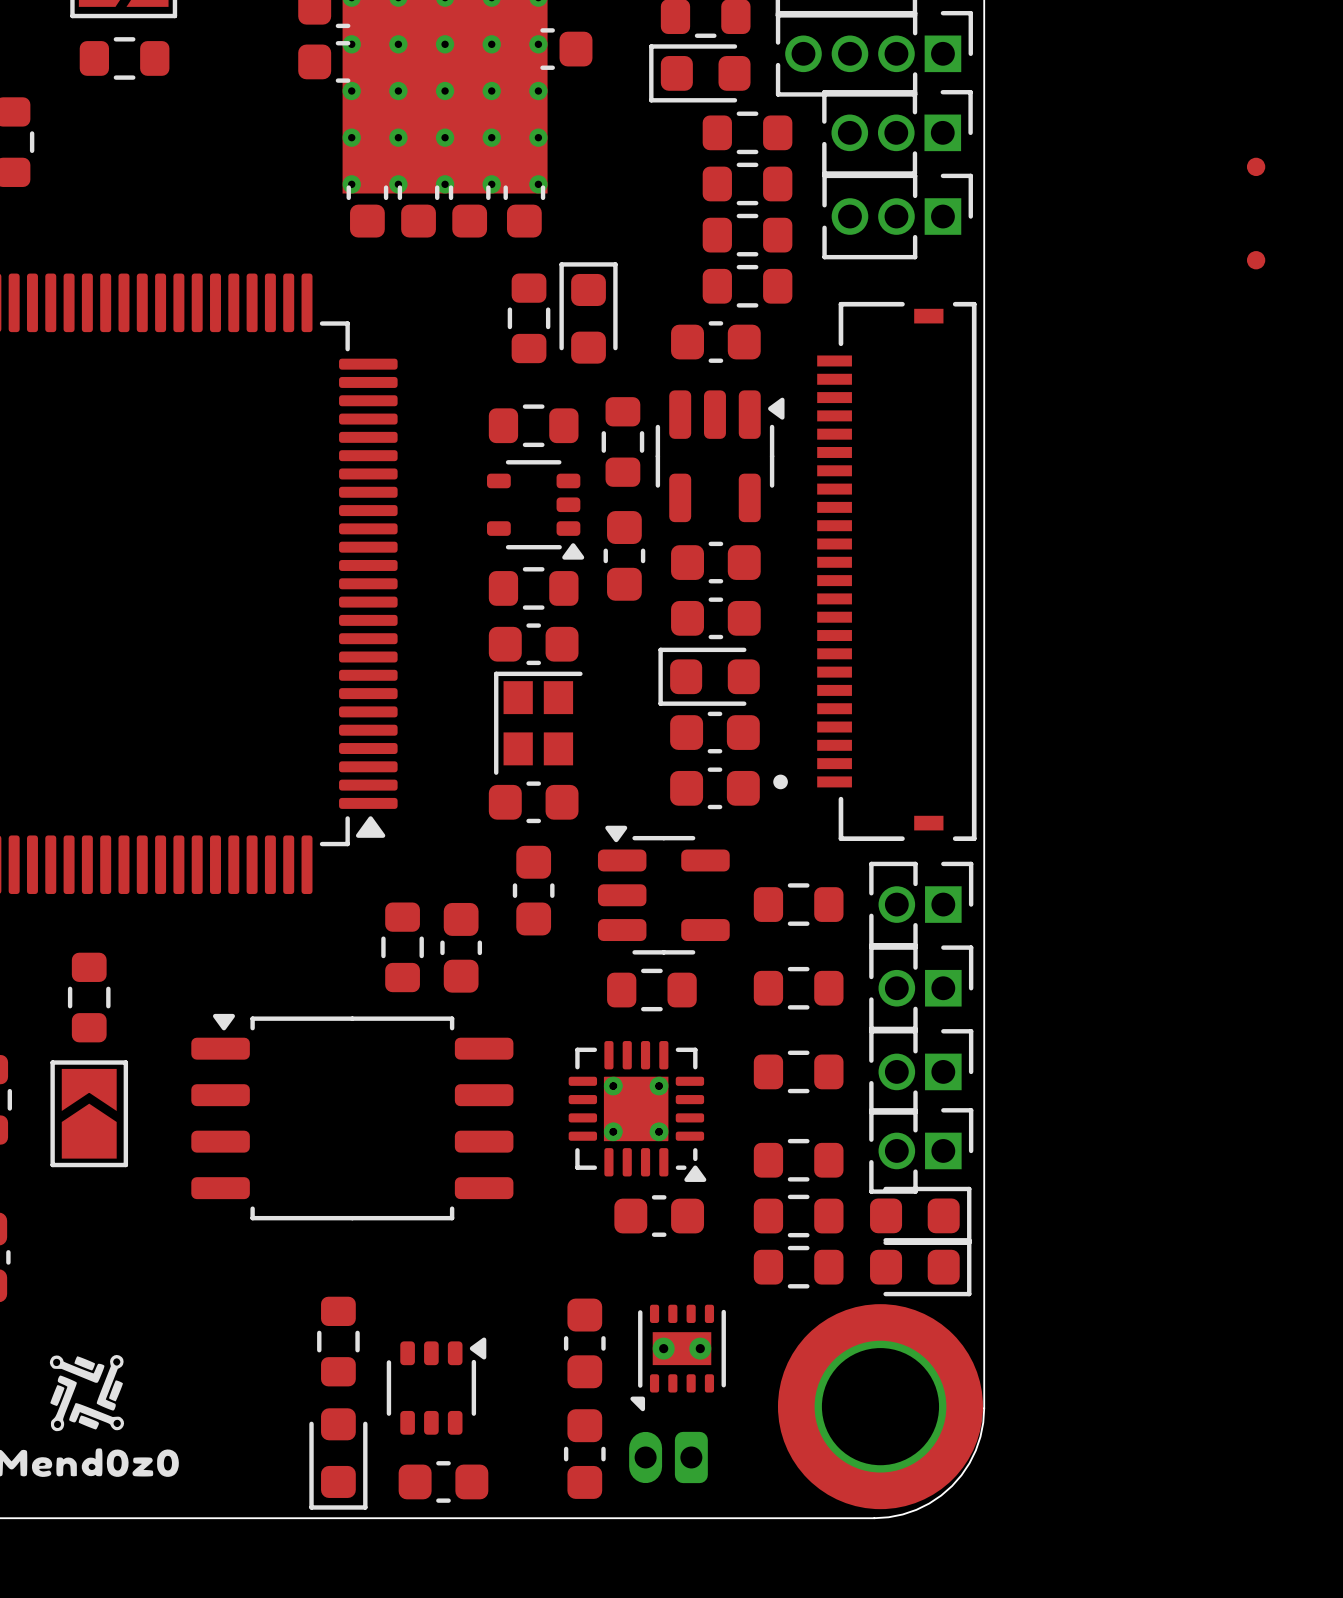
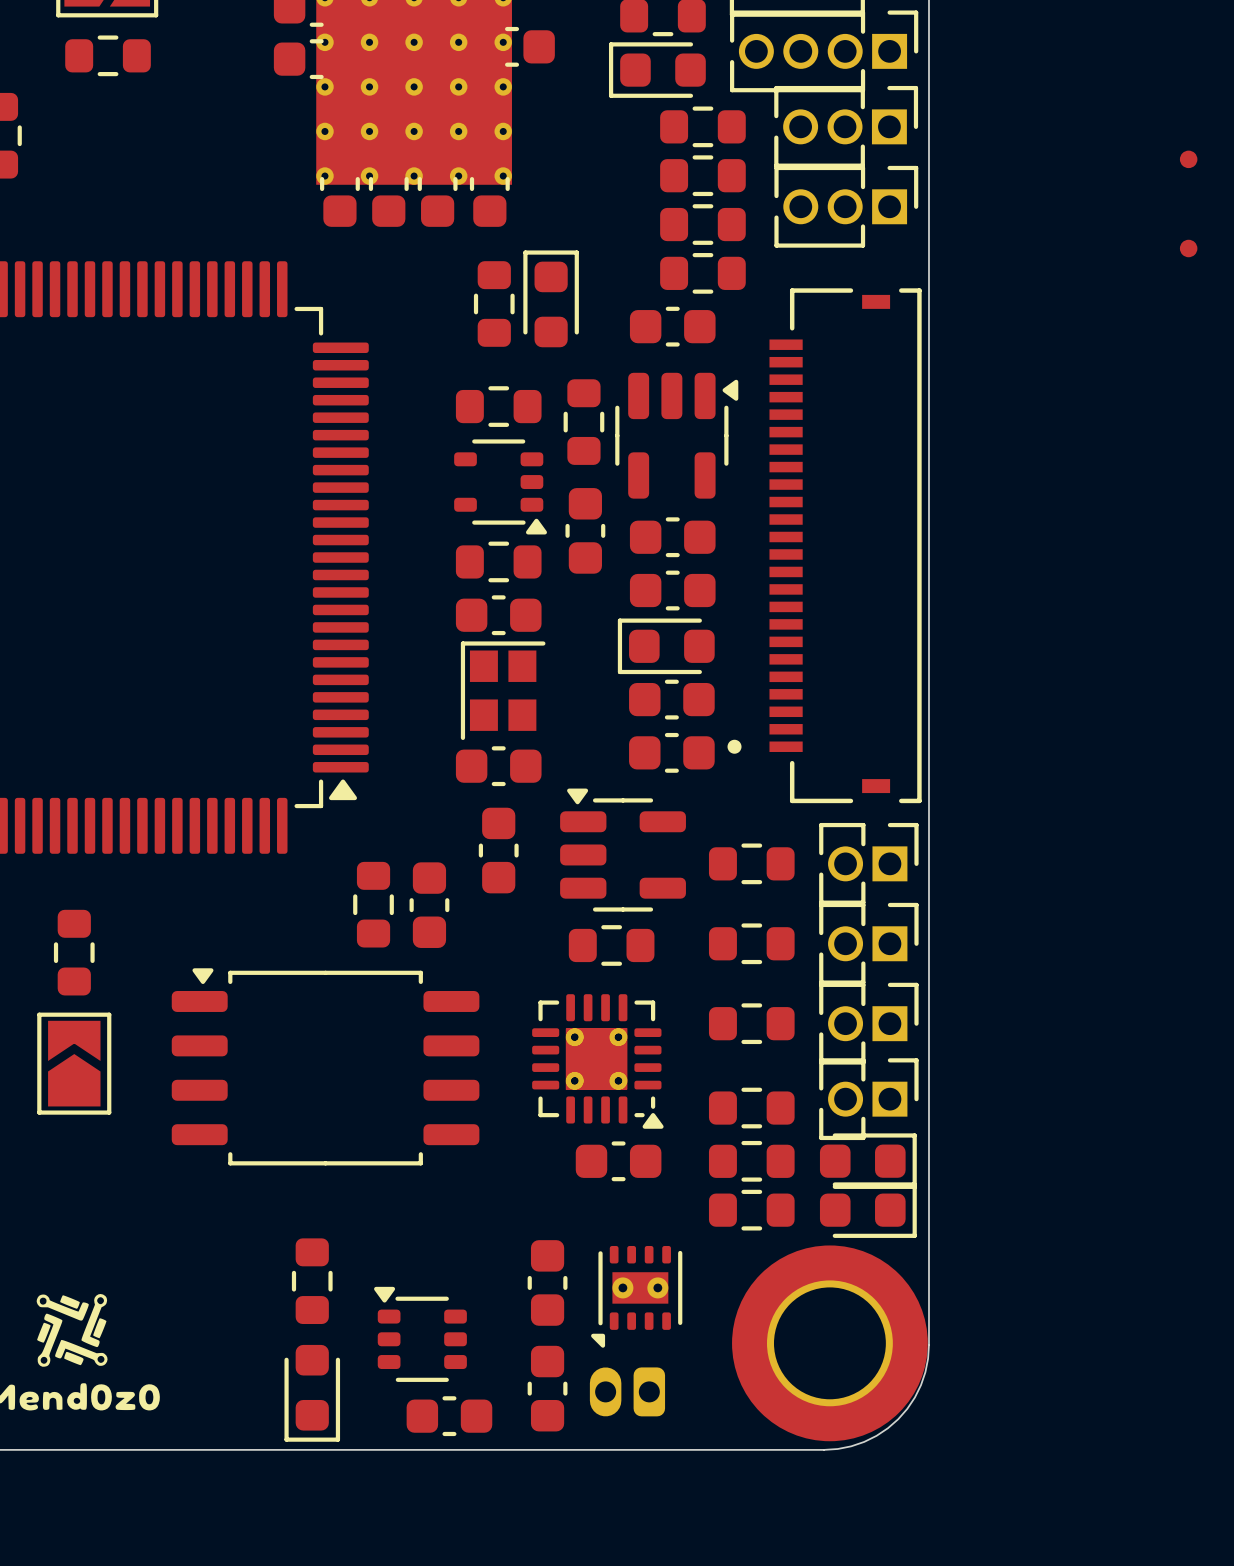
part rotation: 0° (436, 1386) -> 90° counterclockwise (420, 1334)
part position: (443, 1481) -> (449, 1416)

